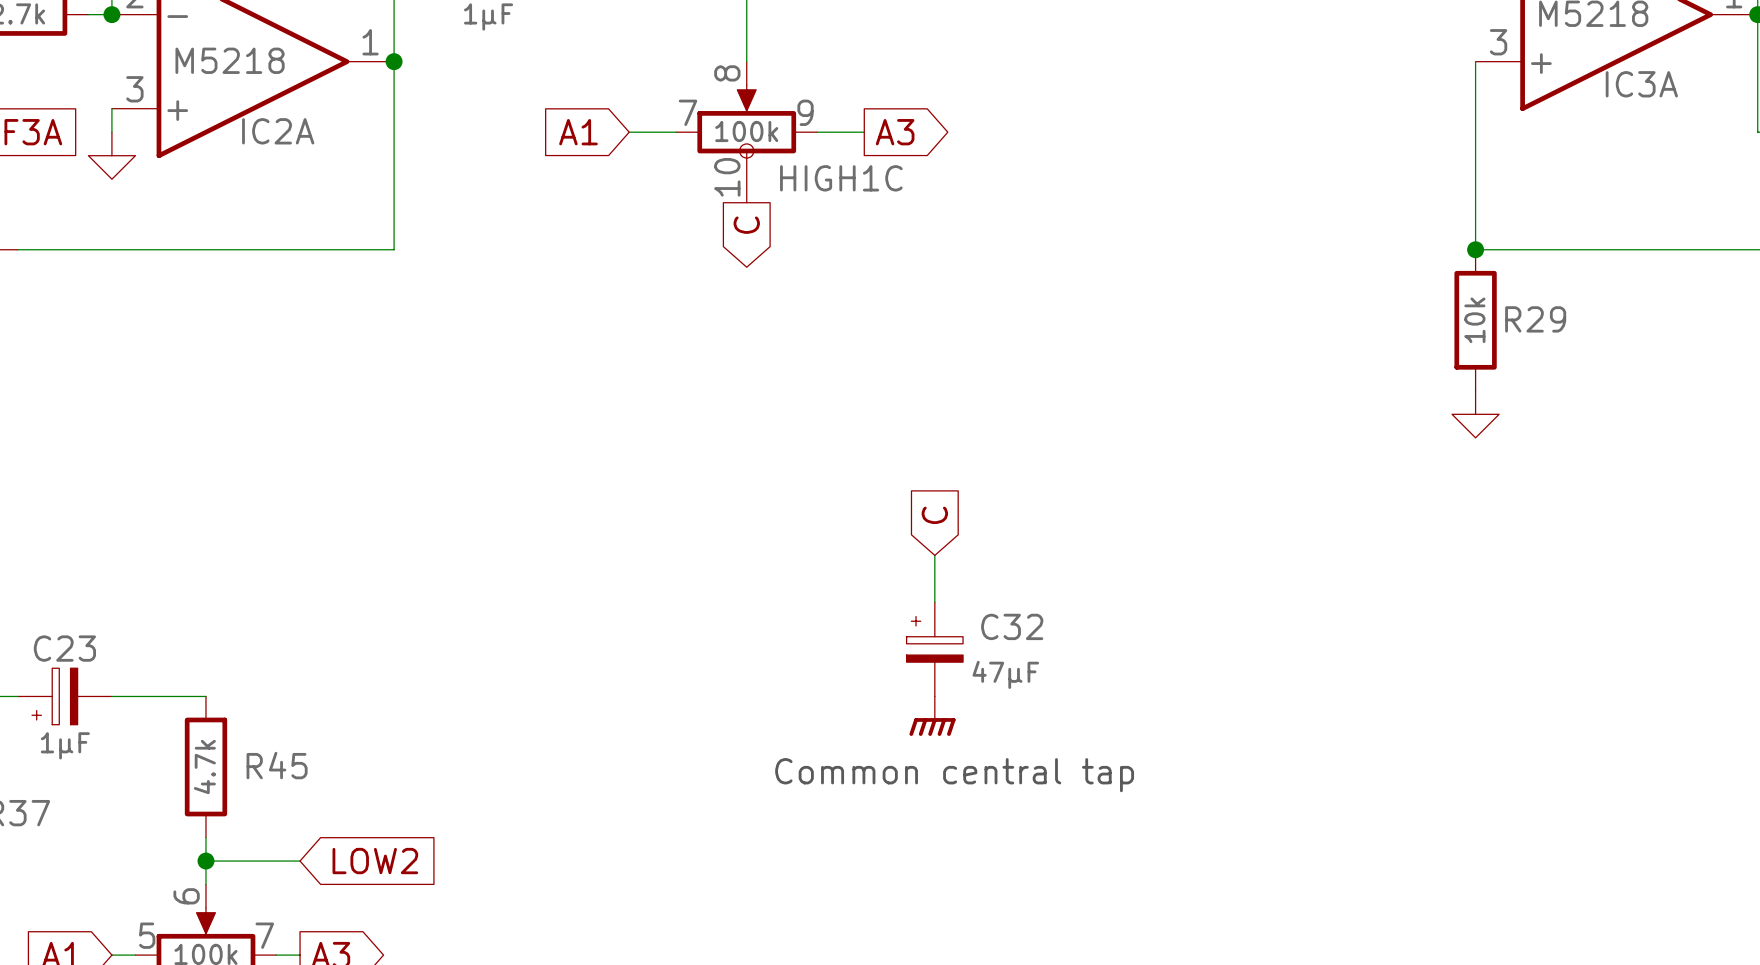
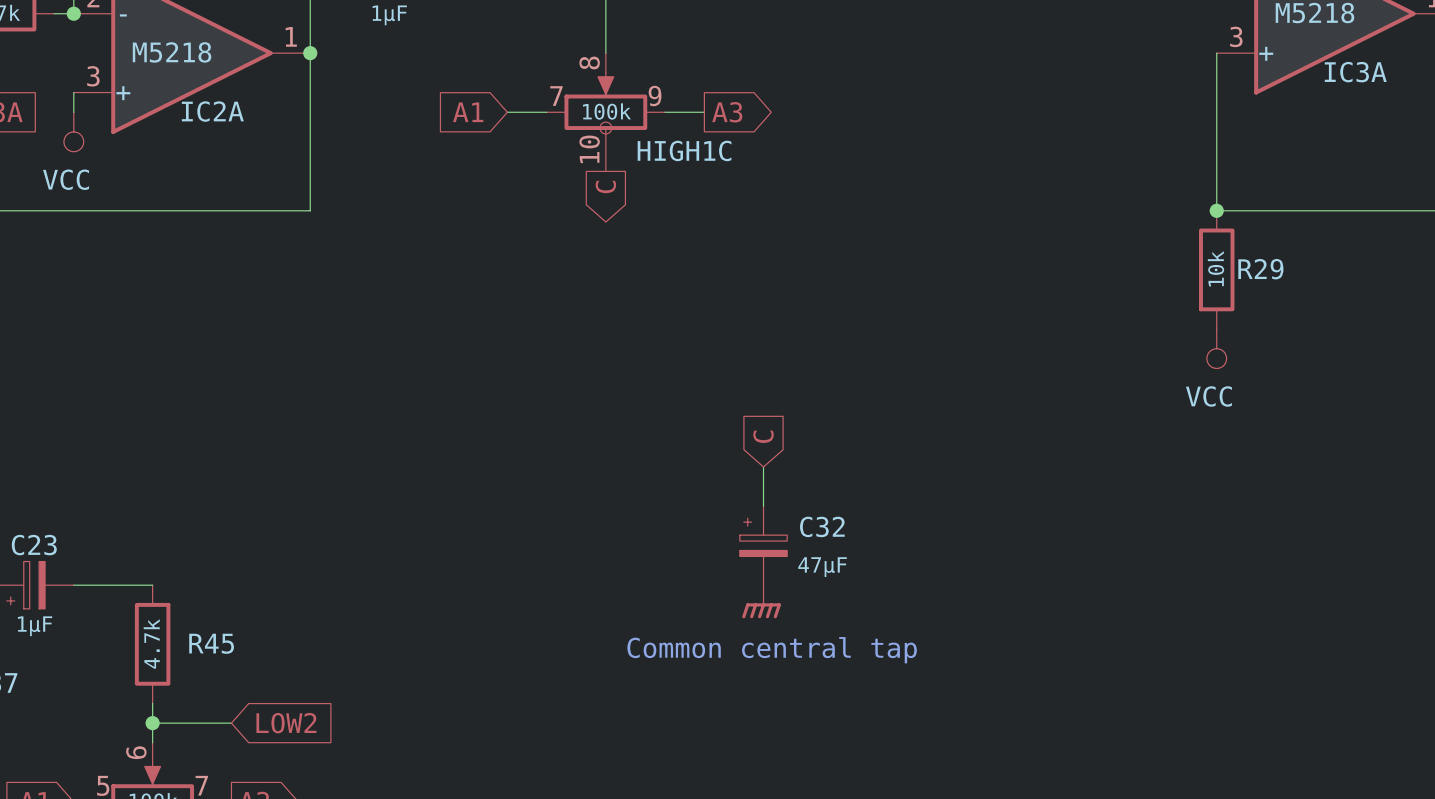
power symbol shape: [88, 132, 136, 180] -> [63, 112, 84, 152]
power symbol text: none -> VCC (66, 179)
power symbol shape: [1452, 390, 1500, 438] -> [1206, 329, 1227, 369]
power symbol text: none -> VCC (1208, 396)

